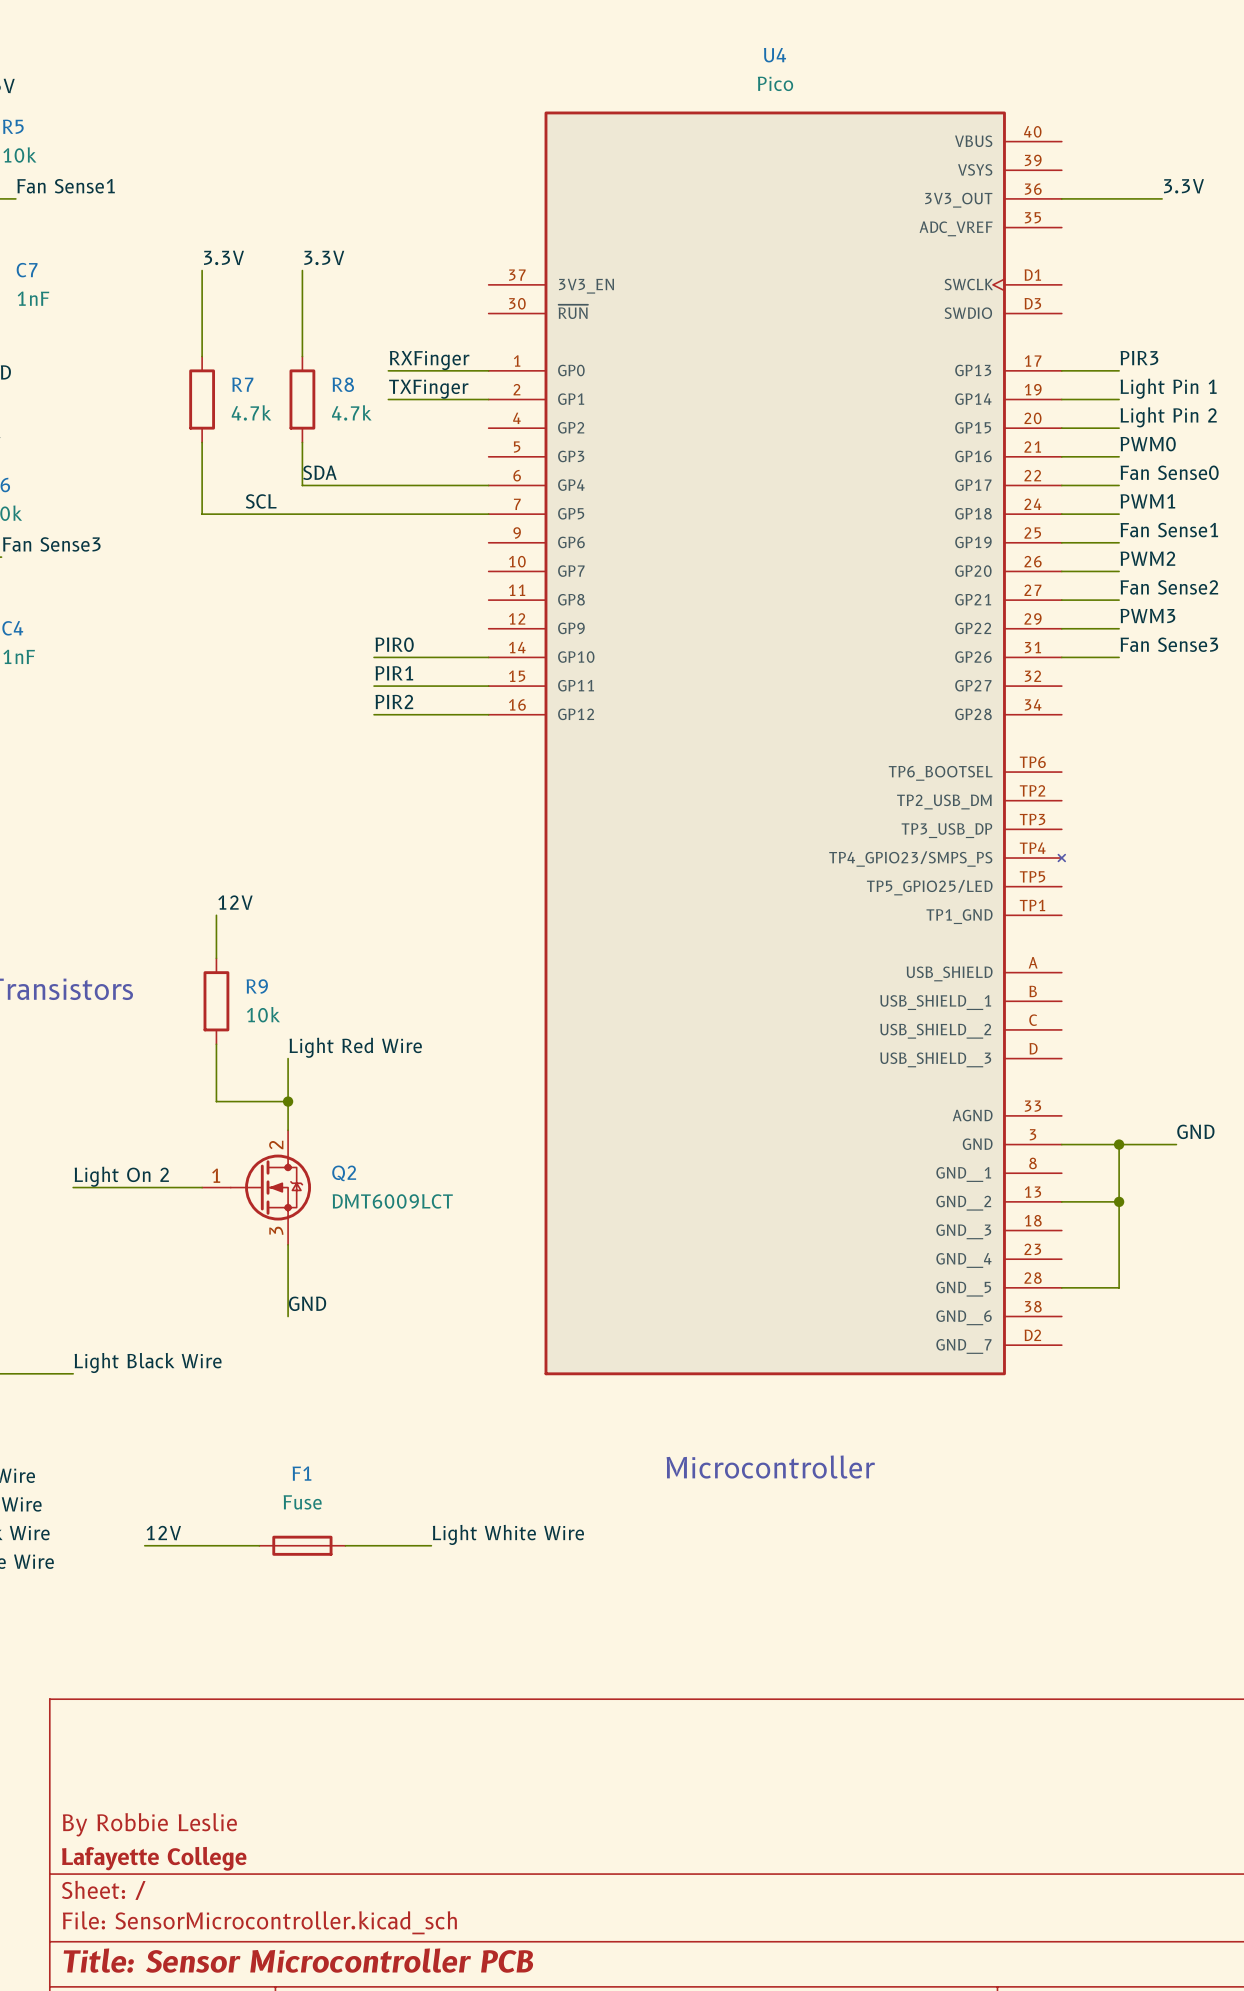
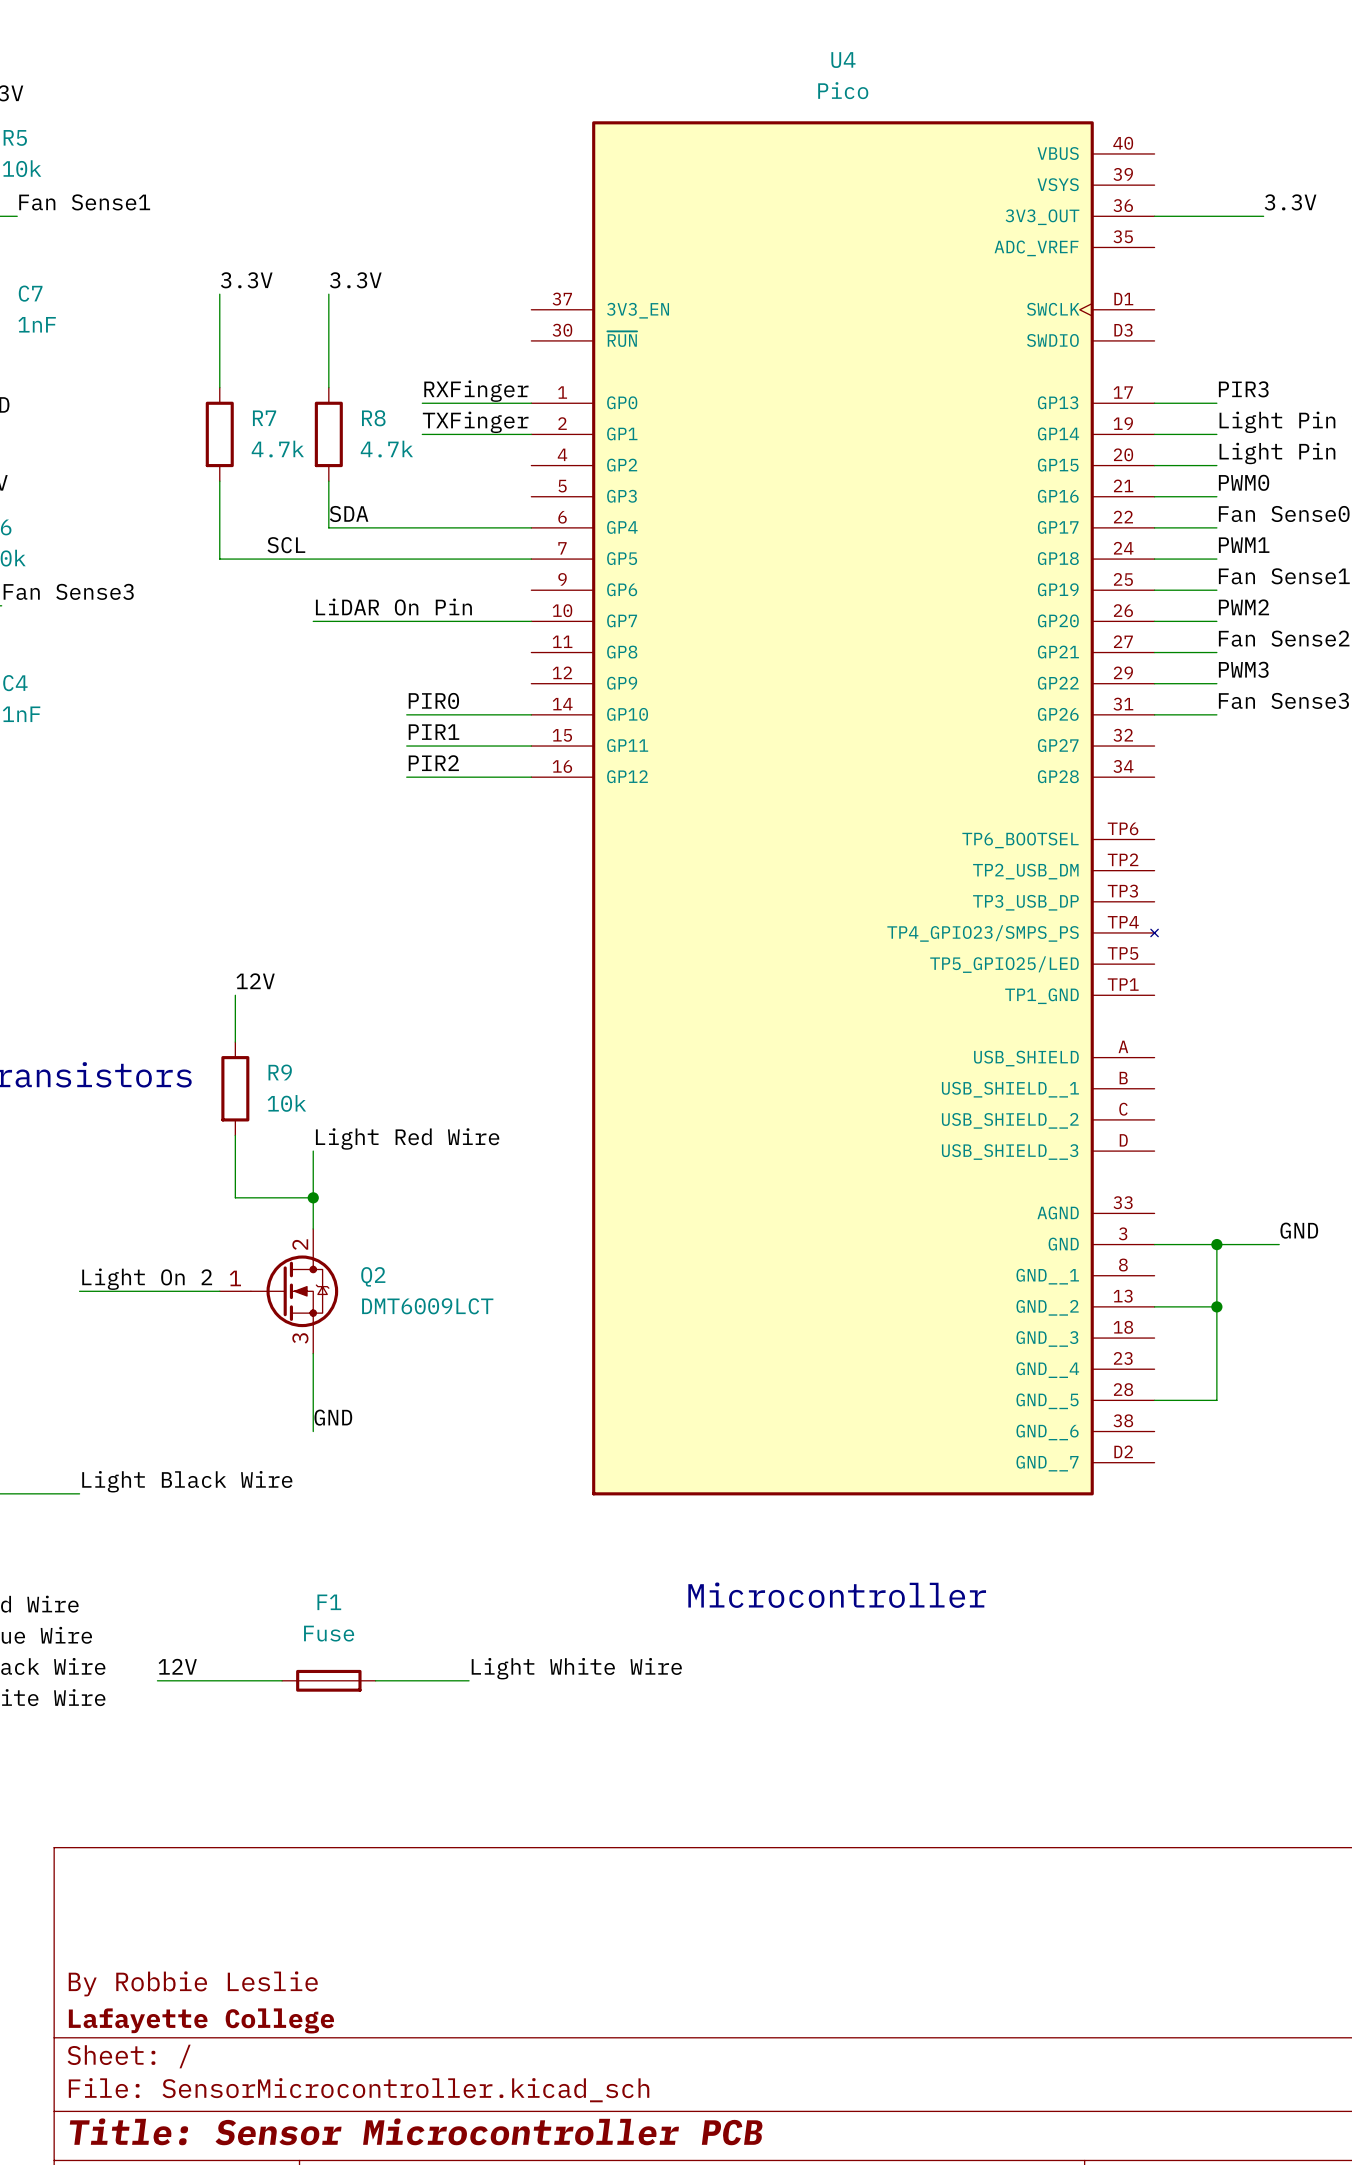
label: none -> LiDAR On Pin (393, 607)
wire: none -> (313, 621) (531, 621)

